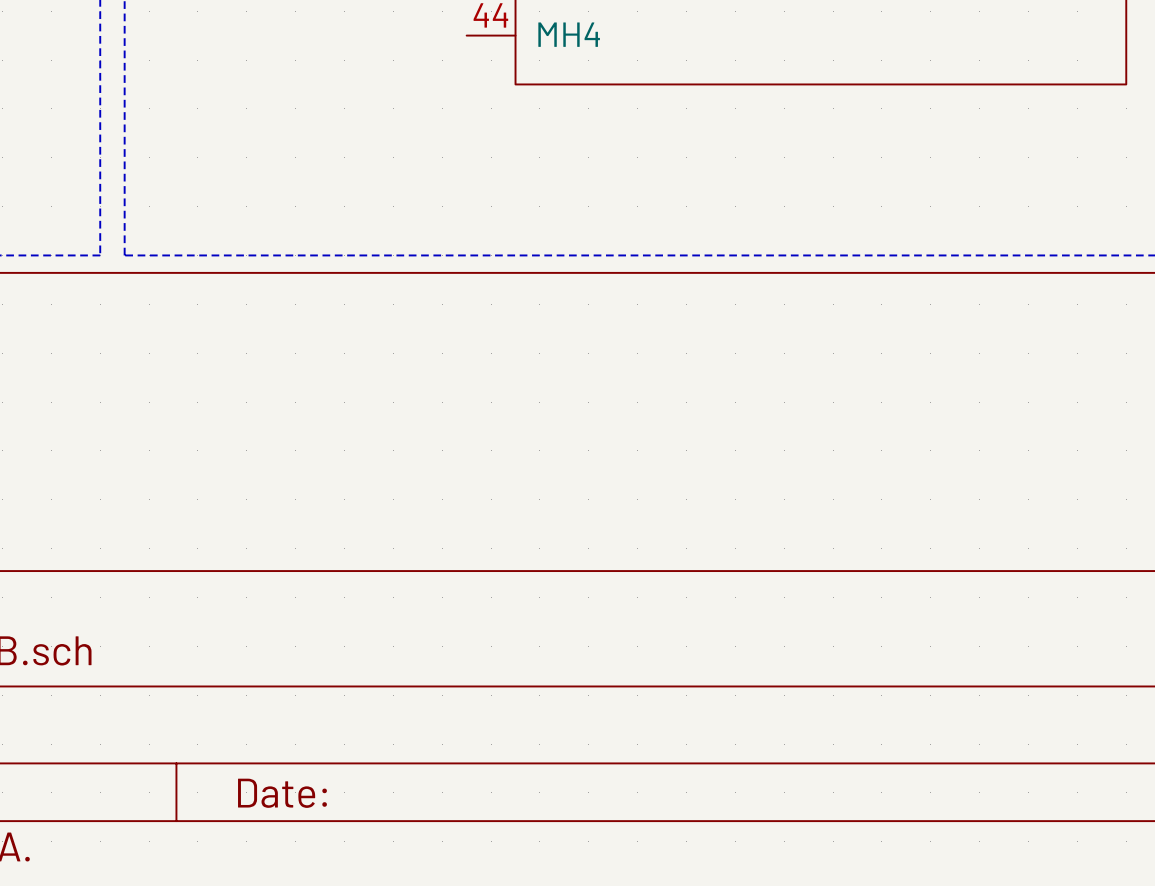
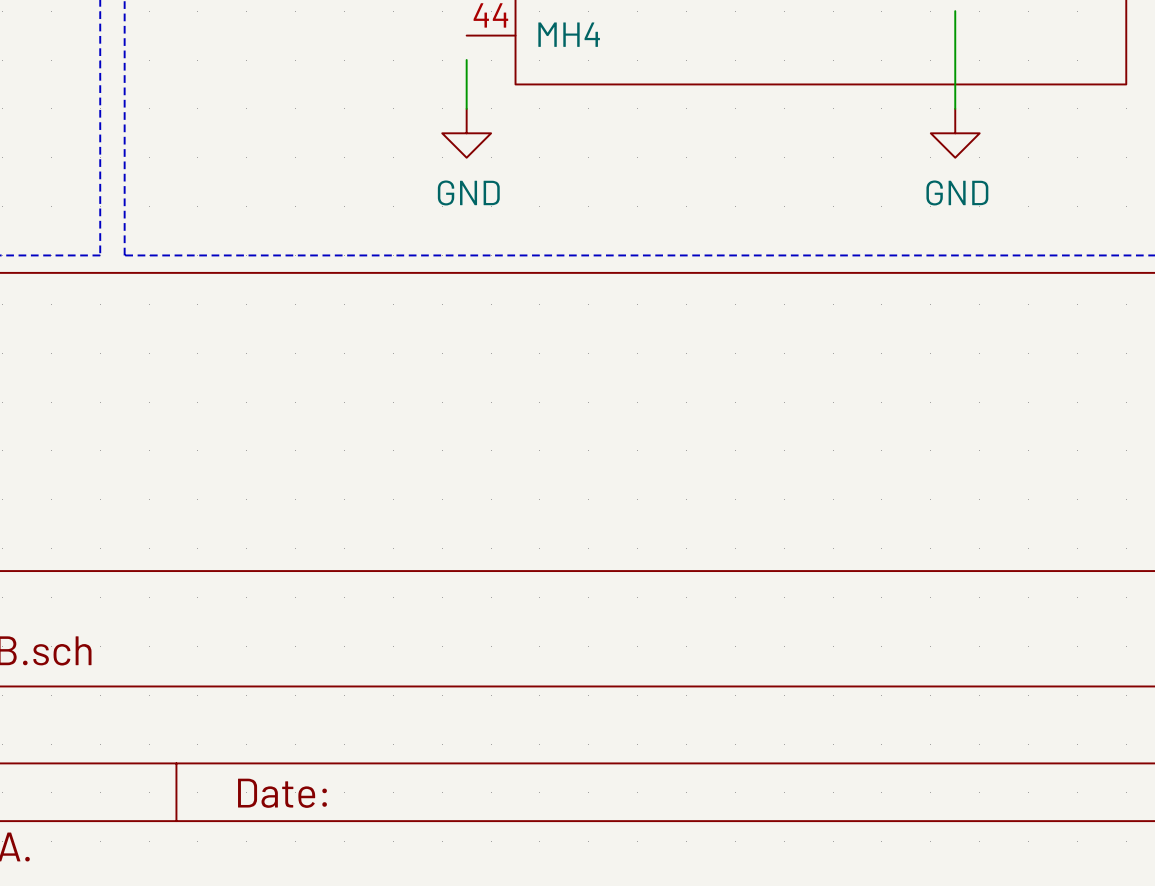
wire: none -> (955, 11) (955, 108)
wire: none -> (466, 60) (466, 108)
power symbol: none -> GND (466, 133)
power symbol: none -> GND (955, 133)

